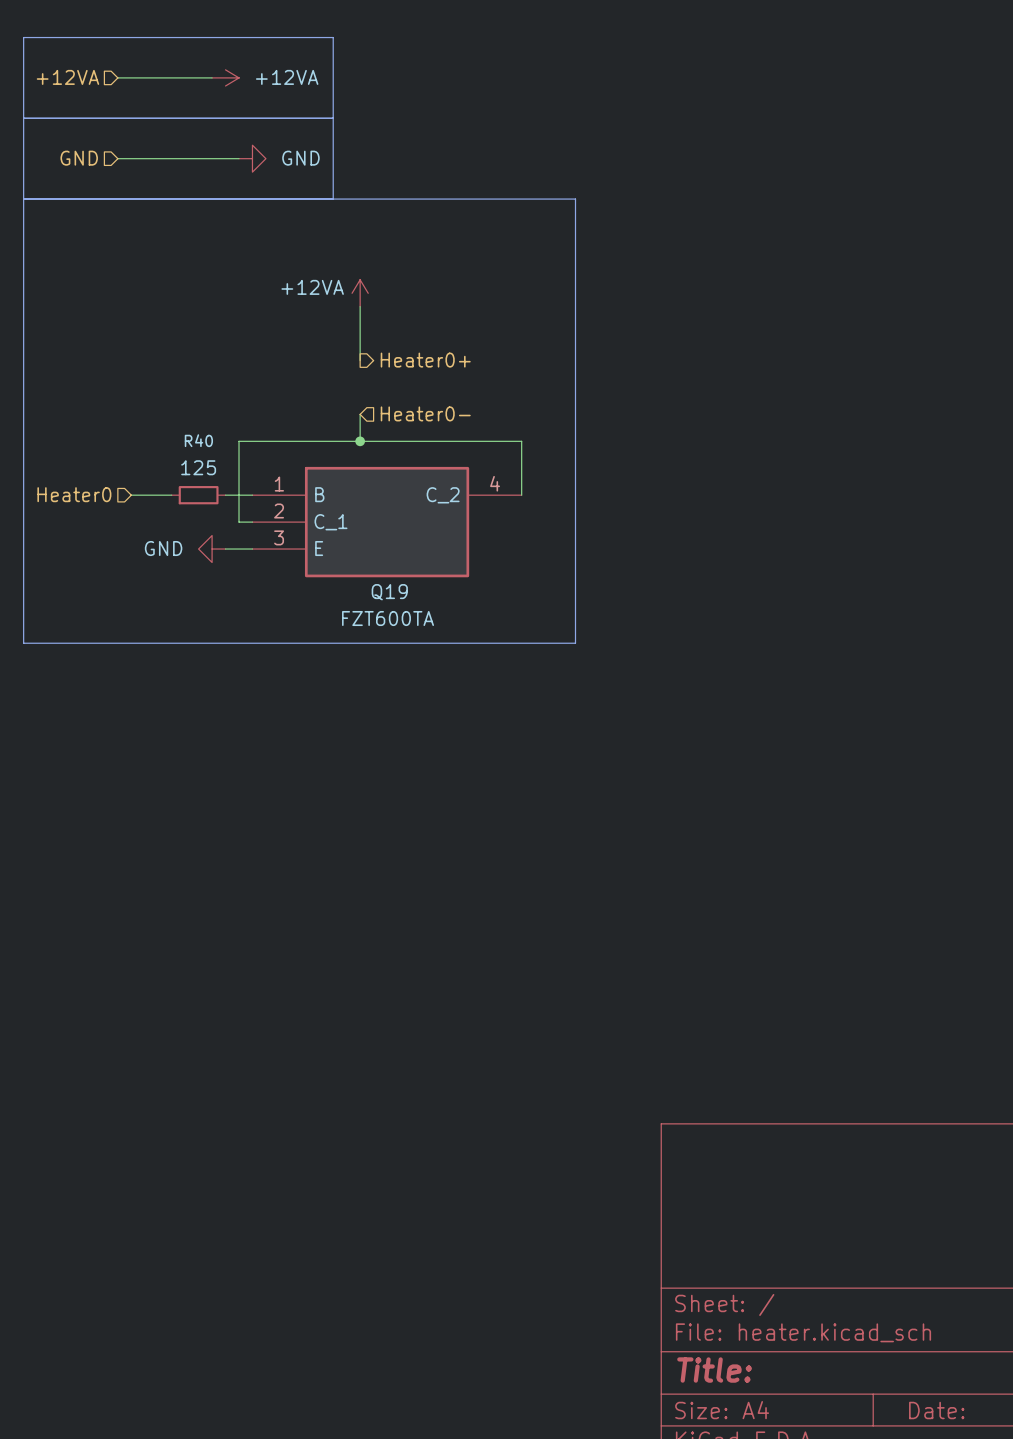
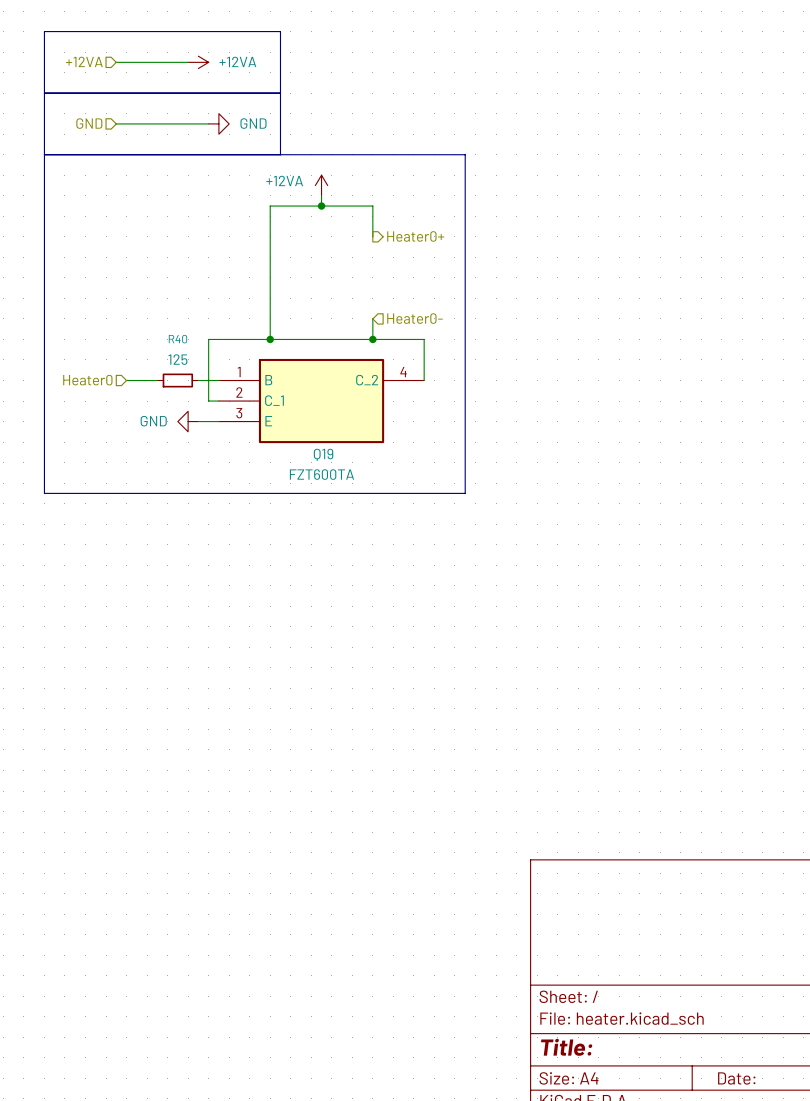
wire: none -> (321, 195) (321, 206)
junction: none -> (321, 206)
power symbol position: +12VA (360, 293) -> +12VA (321, 185)
wire: (360, 306) (360, 360) -> none
wire: none -> (372, 236) (372, 206) (270, 206) (270, 339)
hierarchical label position: Heater0+ (425, 360) -> Heater0+ (415, 236)
hierarchical label position: Heater0- (425, 413) -> Heater0- (415, 318)
wire: (360, 414) (360, 441) -> (372, 318) (372, 339)
junction position: (360, 441) -> (270, 339)
junction: none -> (372, 339)

